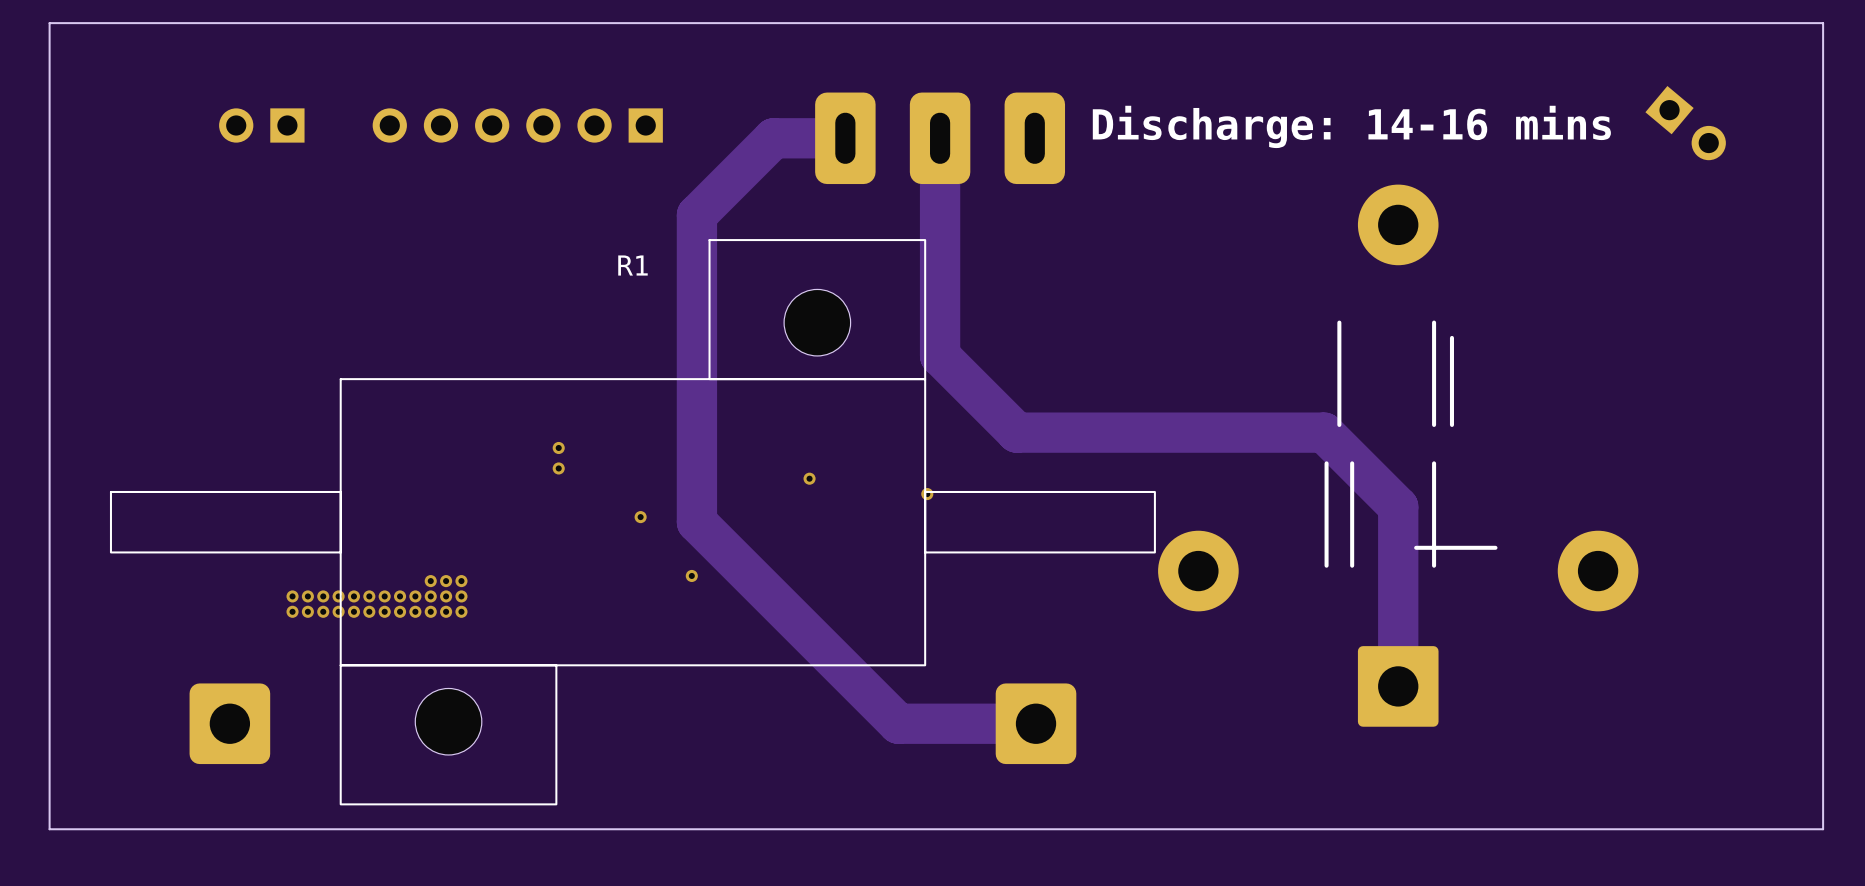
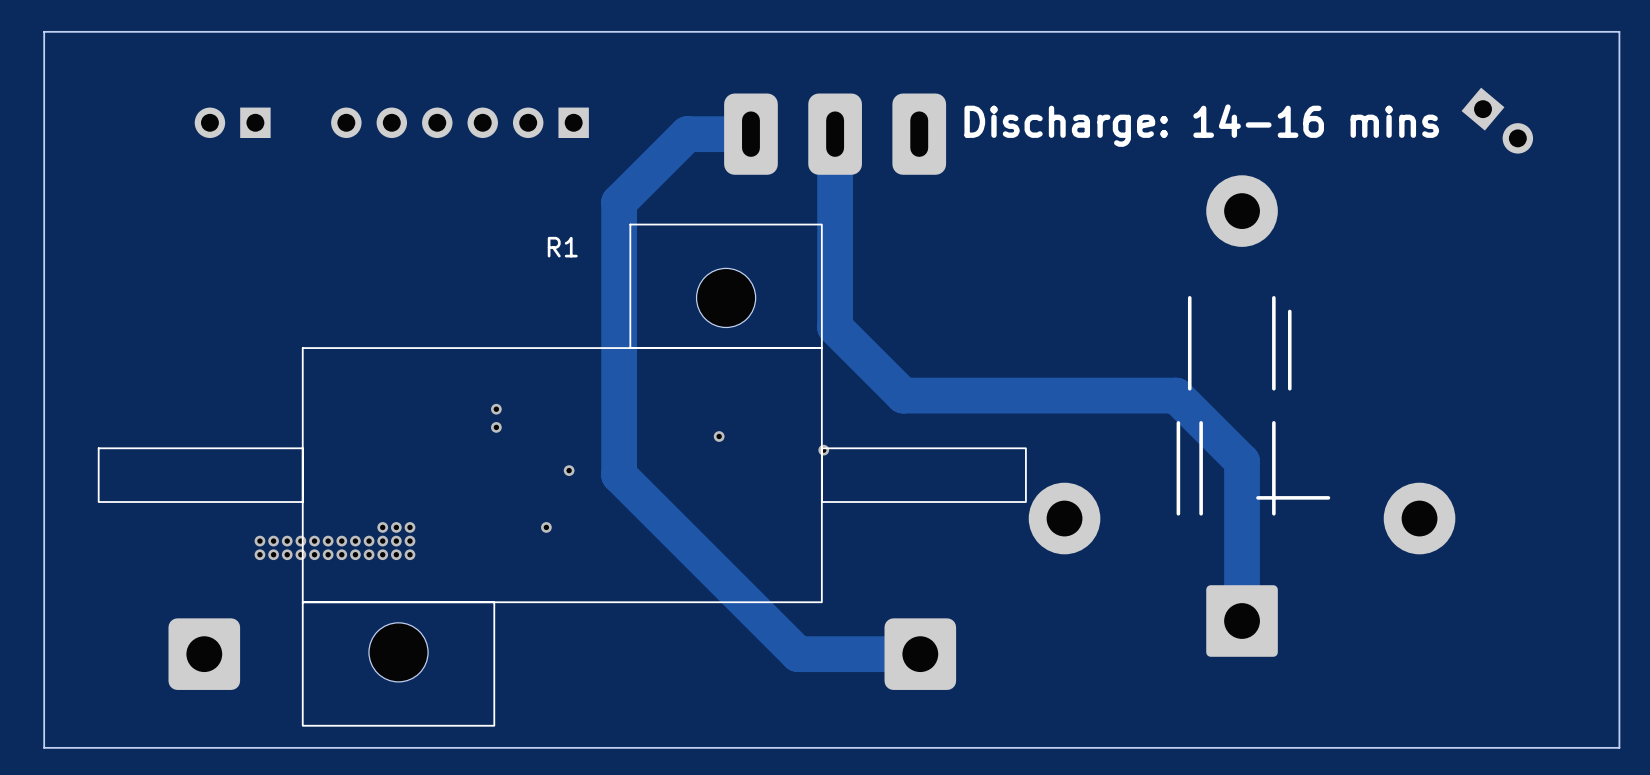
via position: (691, 575) -> (546, 527)

